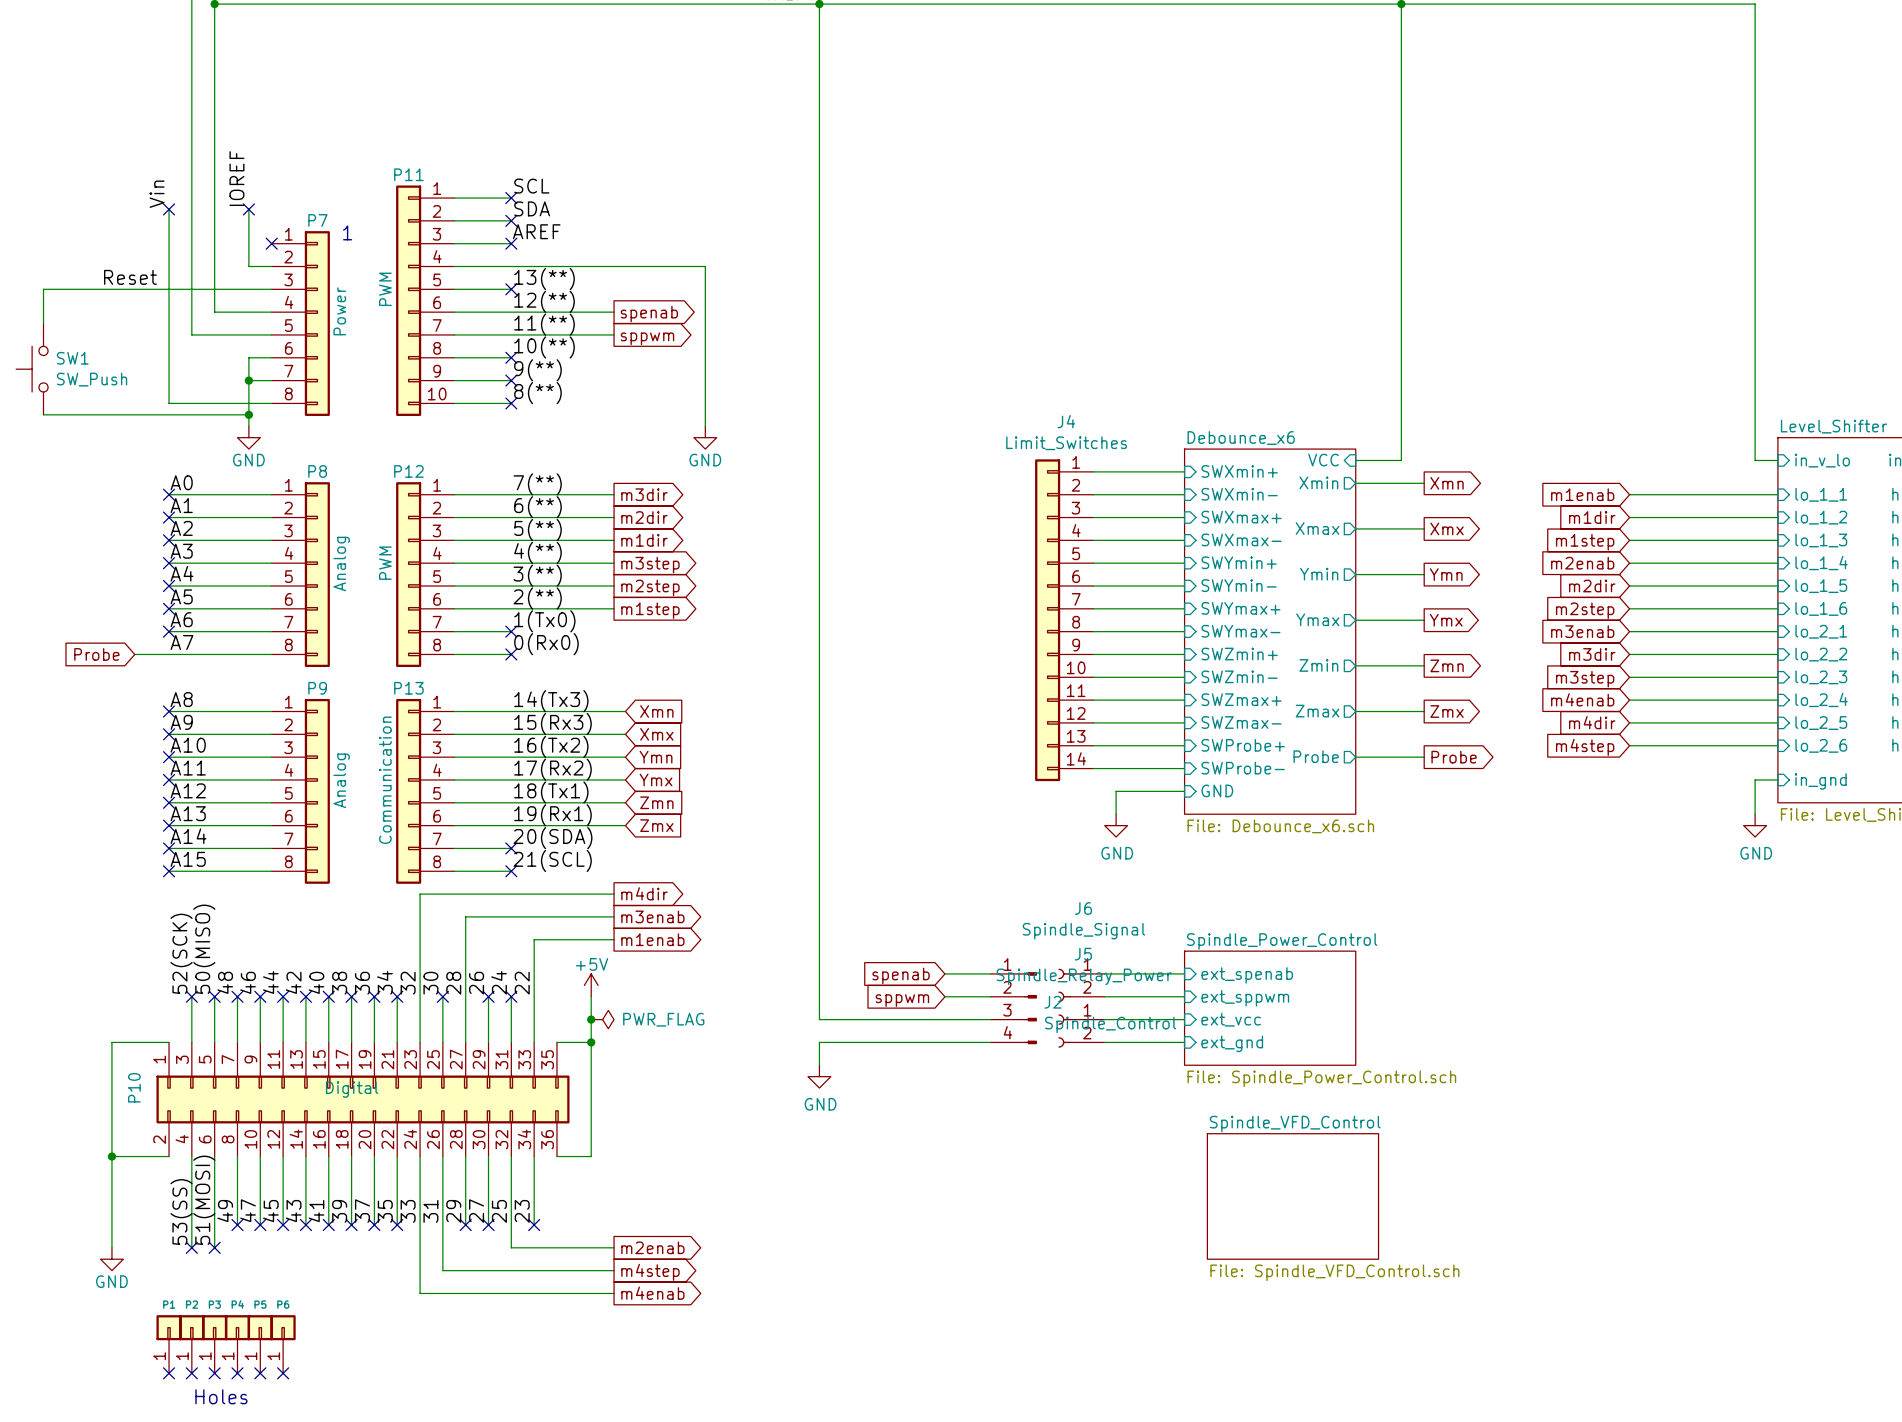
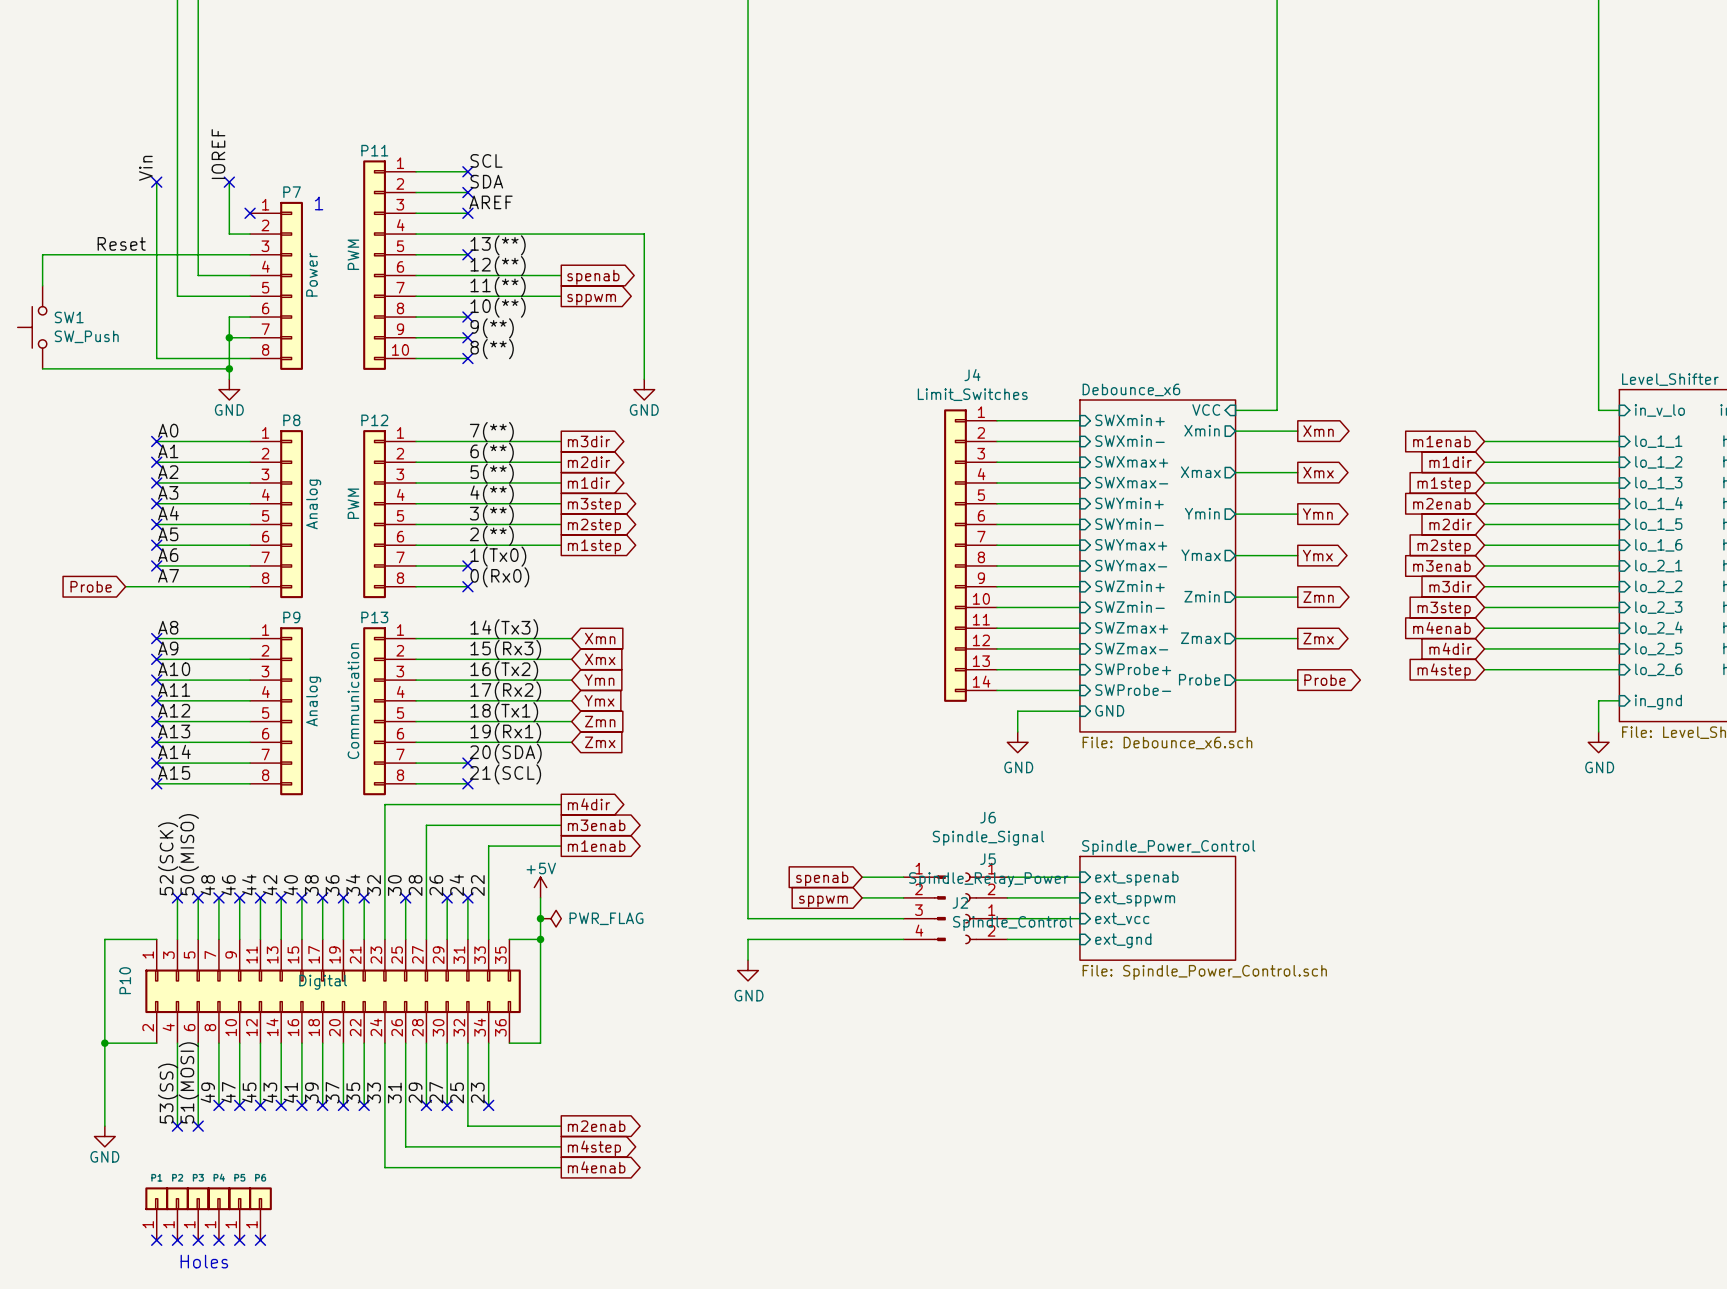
sheet Spindle_VFD_Control: File: Spindle_VFD_Control.sch (1292, 1196) -> none

